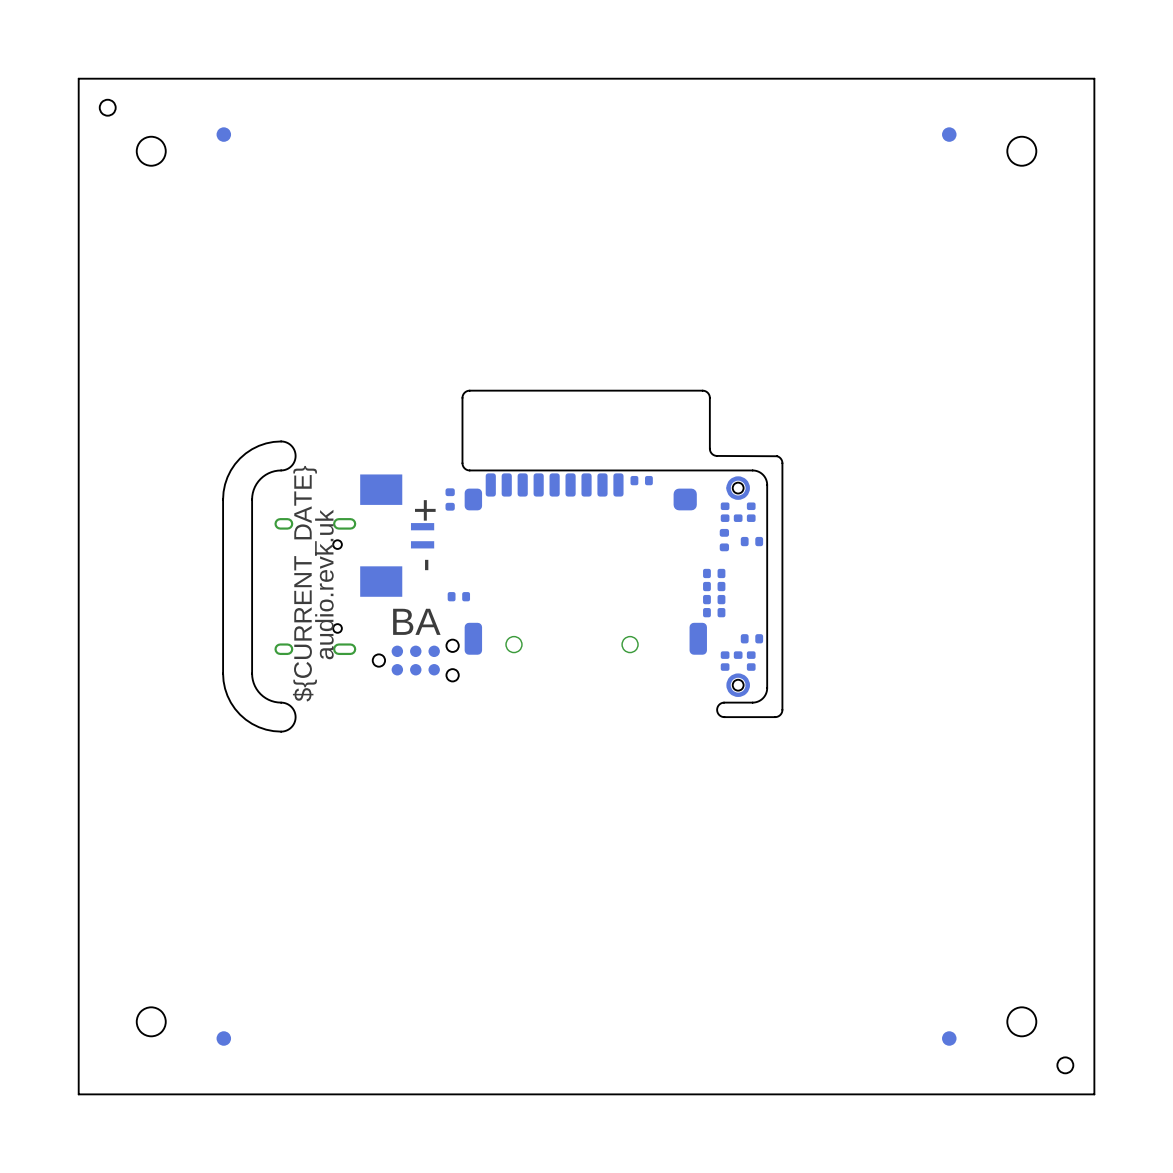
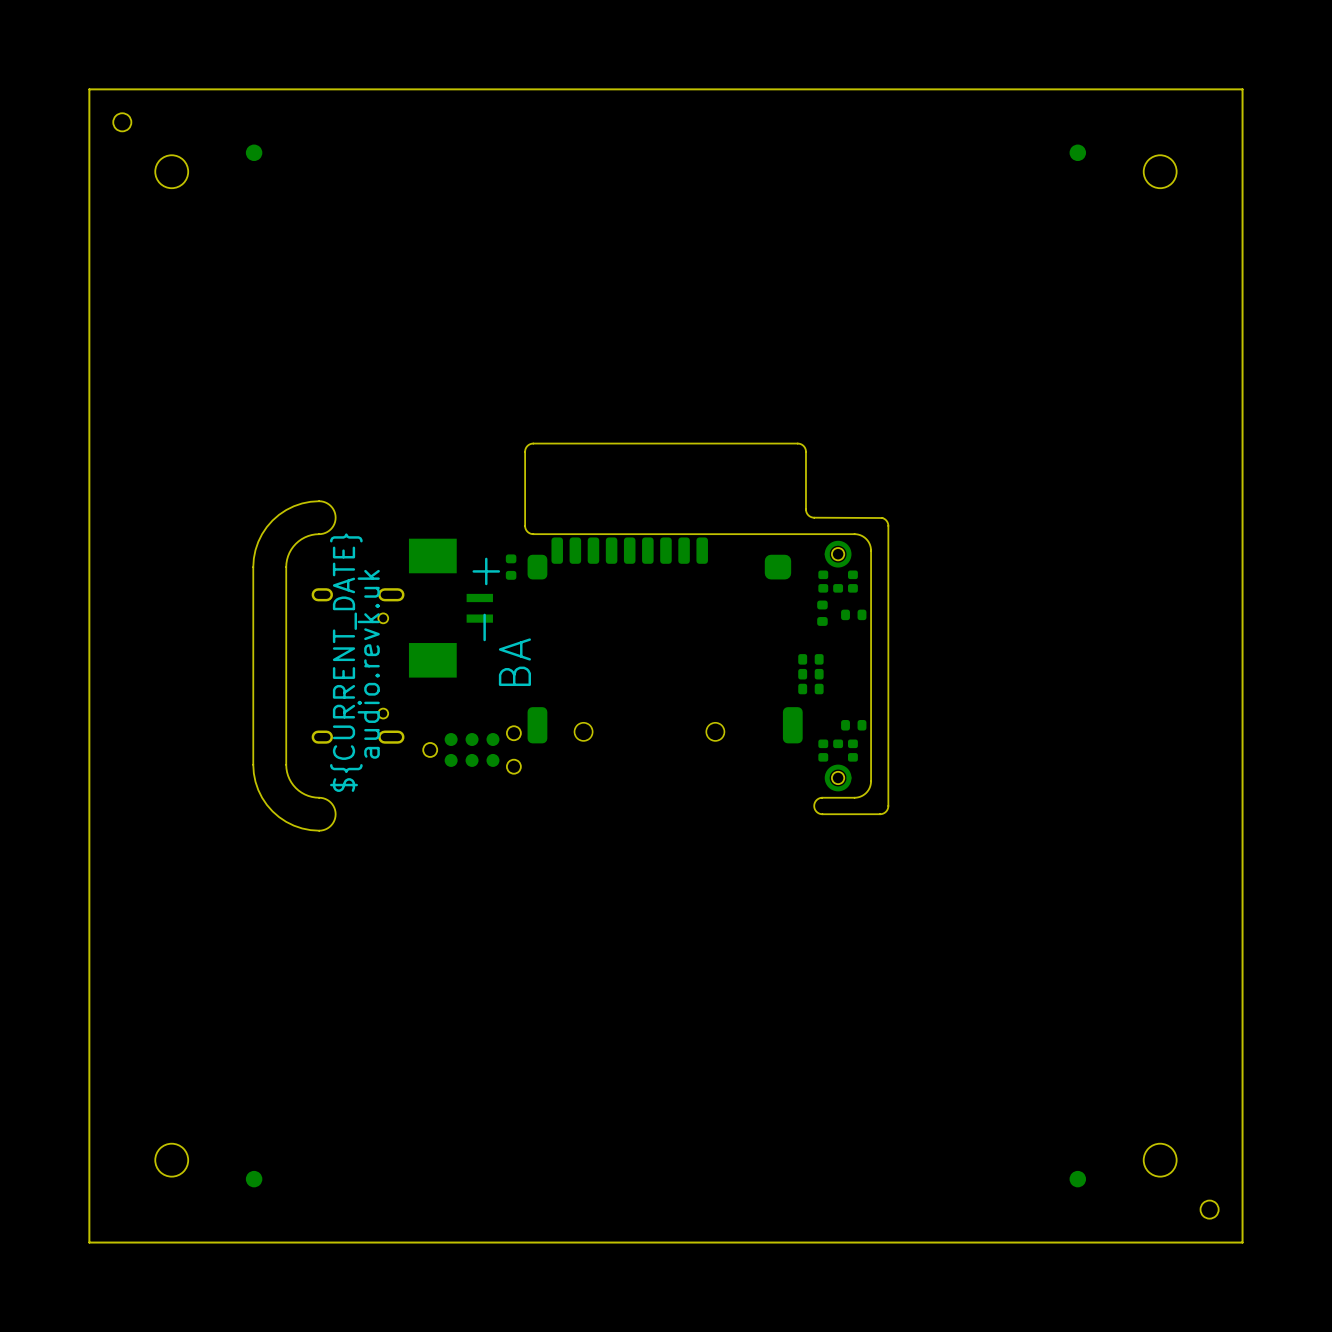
part: (641, 480) -> none
part: (714, 573) -> none
part: none -> (810, 659)
part: (714, 586) -> none
part: none -> (810, 674)
part: (458, 596) -> none
part: (714, 599) -> none
part: none -> (810, 689)
part: (714, 612) -> none
text rotation: 0° (416, 621) -> 90° counterclockwise (514, 662)

